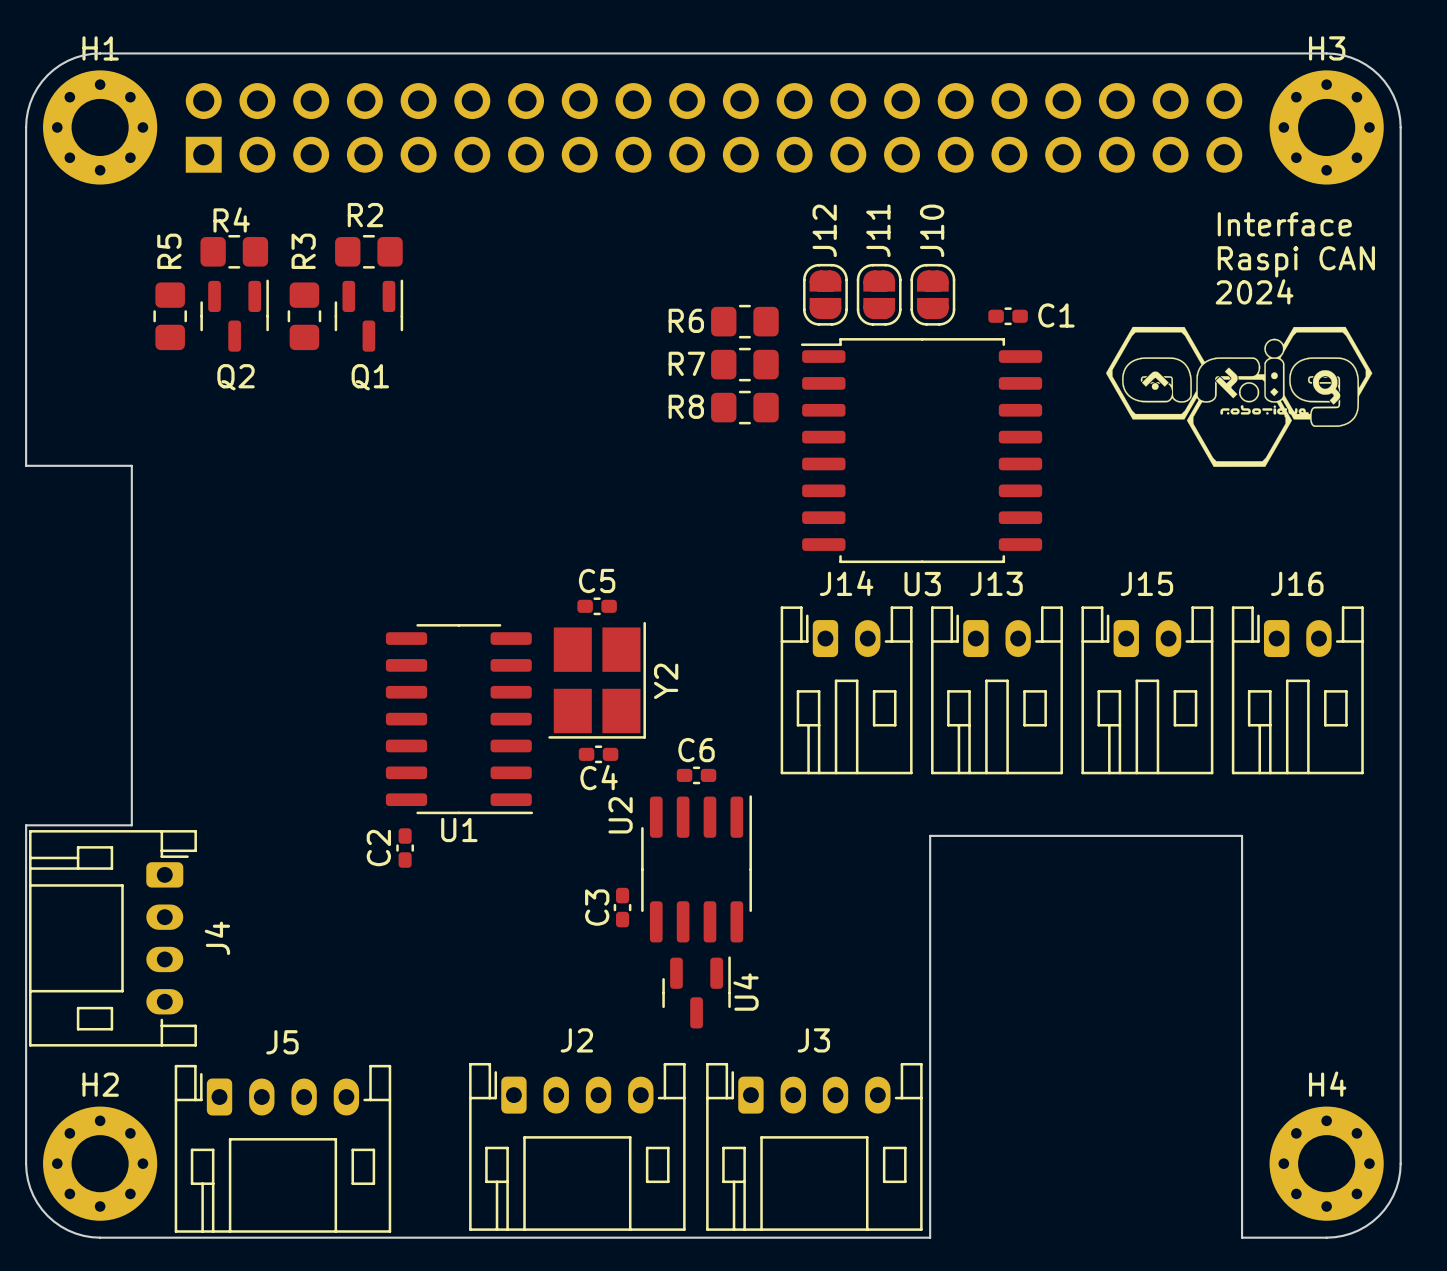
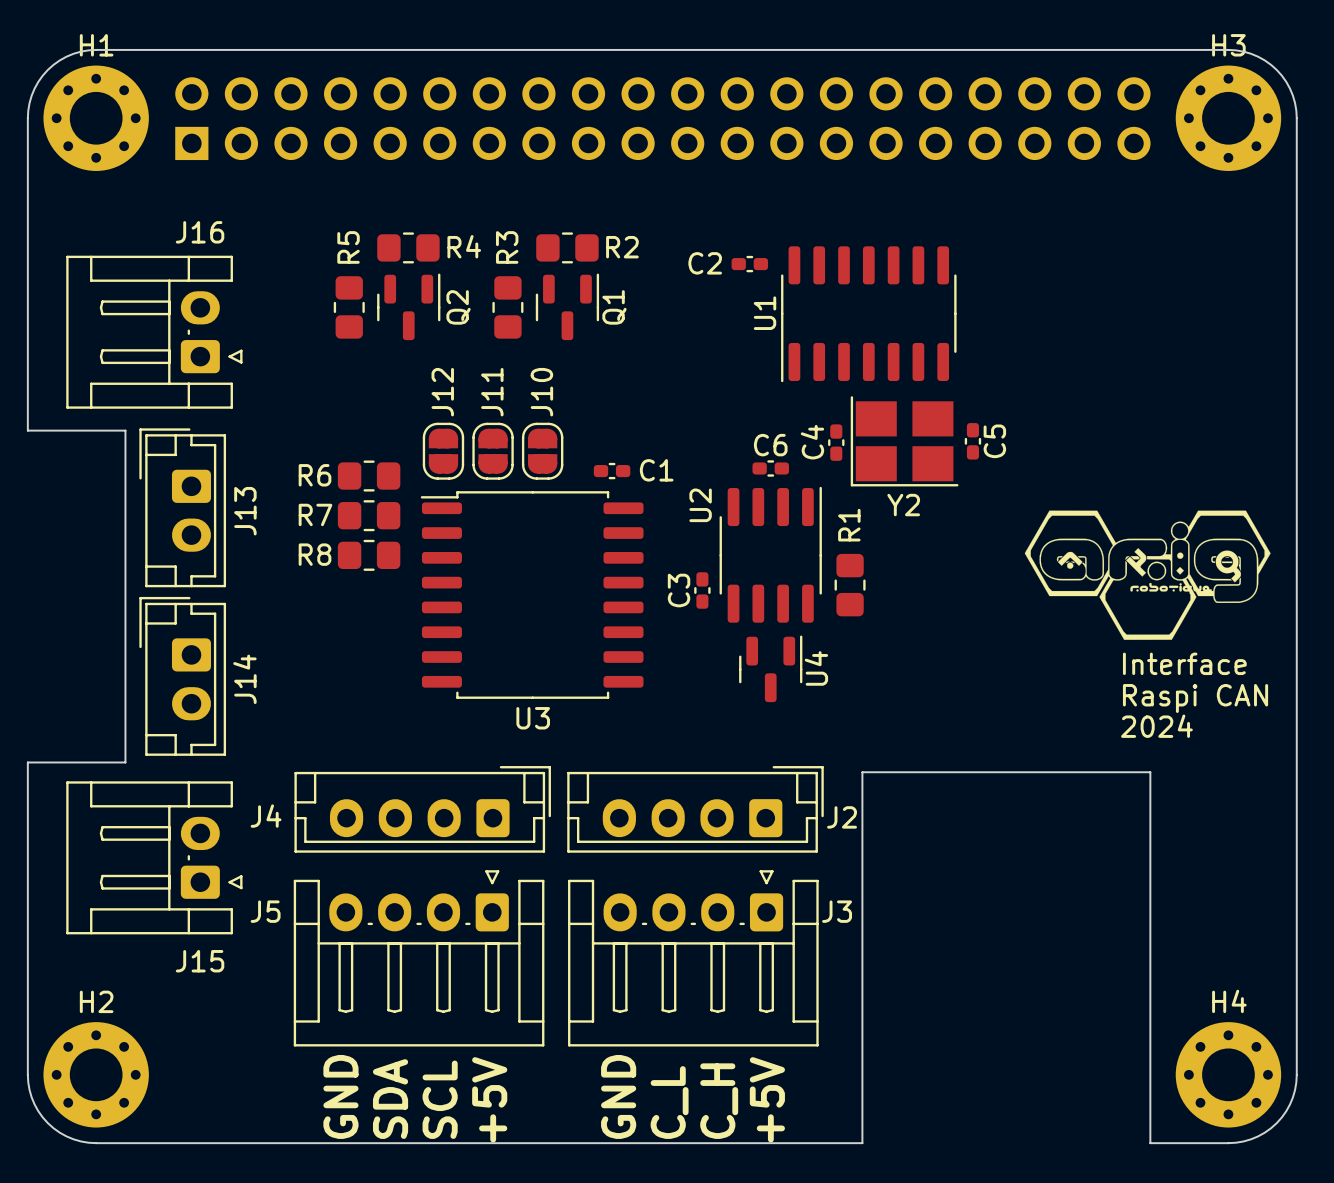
R2 name position: R2 (365, 215) -> R2 (622, 247)
R4 name position: R4 (231, 219) -> R4 (464, 246)
text position: Interface (1284, 224) -> Interface (1184, 663)
R4 position: (234, 251) -> (408, 247)
R2 position: (368, 251) -> (567, 247)
text position: Raspi CAN (1296, 261) -> Raspi CAN (1195, 698)
text position: 2024 (1254, 291) -> 2024 (1156, 726)
J12 position: (825, 294) -> (443, 451)
J11 position: (879, 294) -> (493, 451)
J10 position: (932, 294) -> (542, 451)
Q2 position: (234, 315) -> (408, 306)
Q1 position: (368, 315) -> (567, 306)
R5 position: (170, 316) -> (349, 307)
R3 position: (304, 316) -> (507, 307)
C1 position: (1008, 316) -> (612, 471)
R6 position: (744, 321) -> (369, 476)
R7 position: (744, 364) -> (369, 515)
Q2 name rotation: 0° (236, 377) -> 90° counterclockwise (458, 307)
Q2 name position: Q2 (236, 377) -> Q2 (458, 307)
Q1 name rotation: 0° (370, 377) -> 90° counterclockwise (614, 307)
Q1 name position: Q1 (370, 377) -> Q1 (614, 307)
drawing position: (1239, 396) -> (1147, 575)
R8 position: (744, 407) -> (369, 555)
U3 position: (921, 450) -> (532, 595)
J14 name position: J14 (846, 583) -> J14 (244, 679)
J13 name position: J13 (996, 583) -> J13 (245, 511)
J15 name position: J15 (1146, 583) -> J15 (200, 961)
J16 name position: J16 (1297, 583) -> J16 (200, 232)
C5 rotation: 0° (597, 606) -> 90° clockwise (972, 441)
C5 position: (597, 606) -> (972, 441)
J14 footprint: [780, 606, 913, 775] -> [139, 596, 227, 756]
J13 footprint: [931, 606, 1063, 775] -> [139, 428, 227, 588]
J15 footprint: [1081, 606, 1214, 775] -> [66, 781, 243, 935]
J16 footprint: [1231, 606, 1364, 775] -> [66, 255, 243, 409]
R1: none -> (850, 585)
Y2 rotation: 0° (597, 680) -> 90° clockwise (904, 441)
Y2 position: (597, 680) -> (904, 441)
U1 rotation: 0° (459, 719) -> 90° clockwise (868, 314)
U1 position: (459, 719) -> (868, 314)
C4 rotation: 0° (598, 754) -> 90° clockwise (836, 442)
C4 position: (598, 754) -> (836, 442)
C6 position: (696, 775) -> (770, 468)
J4 footprint: [29, 830, 197, 1047] -> [294, 766, 551, 853]
C2 rotation: 0° (405, 848) -> 90° clockwise (749, 264)
C2 position: (405, 848) -> (749, 264)
U2 position: (696, 868) -> (770, 554)
C3 position: (622, 907) -> (702, 590)
J4 name position: J4 (217, 938) -> J4 (266, 816)
U4 position: (696, 992) -> (770, 668)
J2 name position: J2 (576, 1040) -> J2 (842, 817)
J3 name position: J3 (813, 1040) -> J3 (837, 911)
J5 name position: J5 (282, 1042) -> J5 (265, 911)
J2 footprint: [469, 1062, 686, 1231] -> [567, 766, 824, 853]
J3 footprint: [706, 1062, 923, 1231] -> [568, 870, 819, 1047]
J5 footprint: [174, 1064, 392, 1233] -> [293, 870, 545, 1047]
text: none -> GND (340, 1096)
text: none -> GND (618, 1096)
text: none -> SDA (390, 1099)
text: none -> SCL (440, 1099)
text: none -> +5V (489, 1099)
text: none -> +5V (767, 1099)
text: none -> C_H (719, 1101)
text: none -> C_L (669, 1102)

